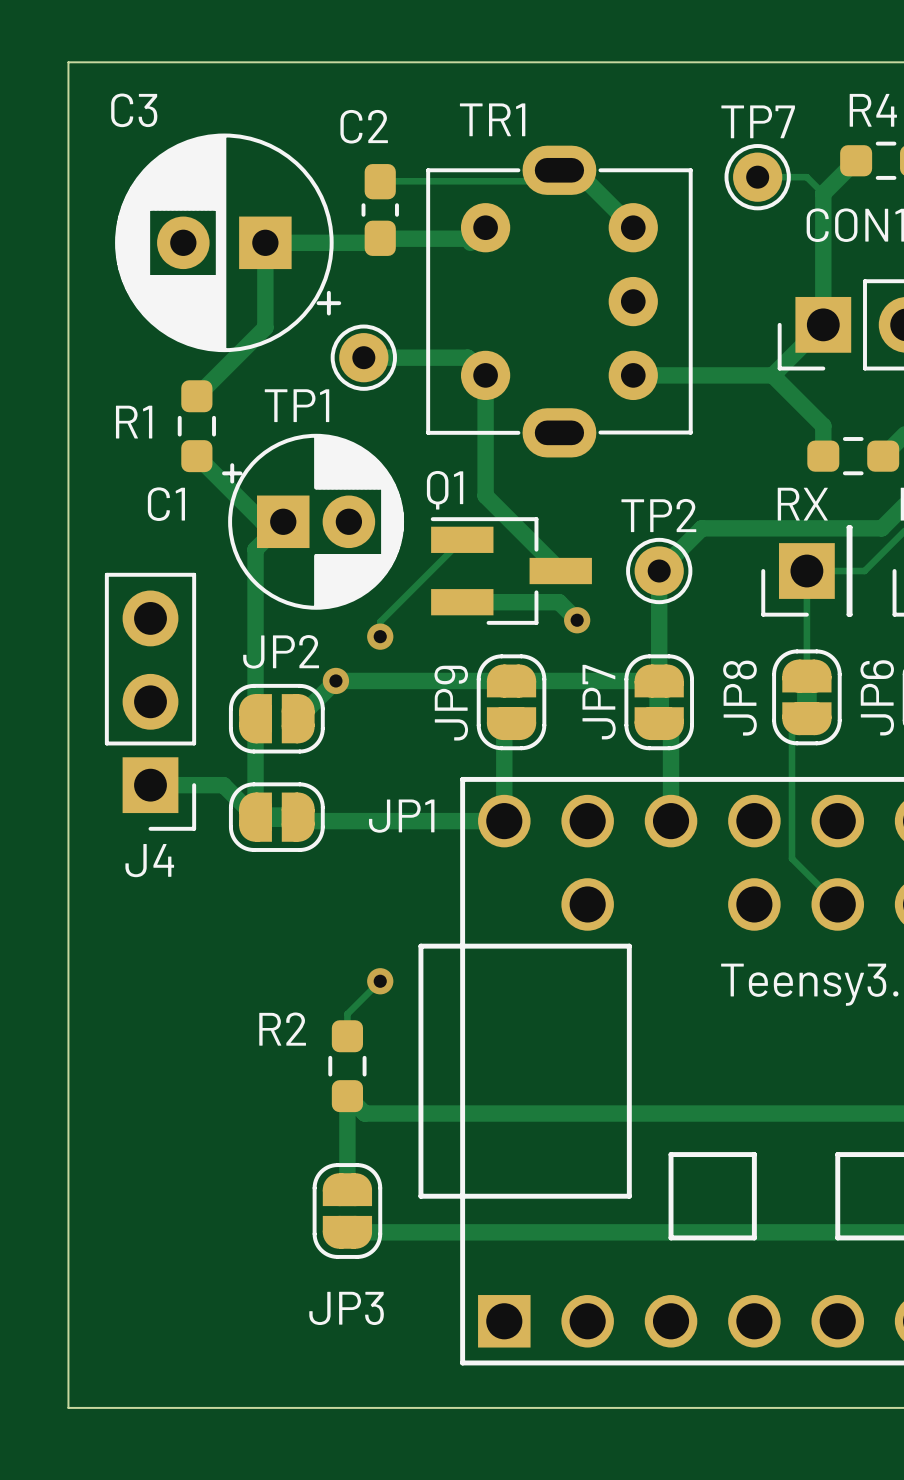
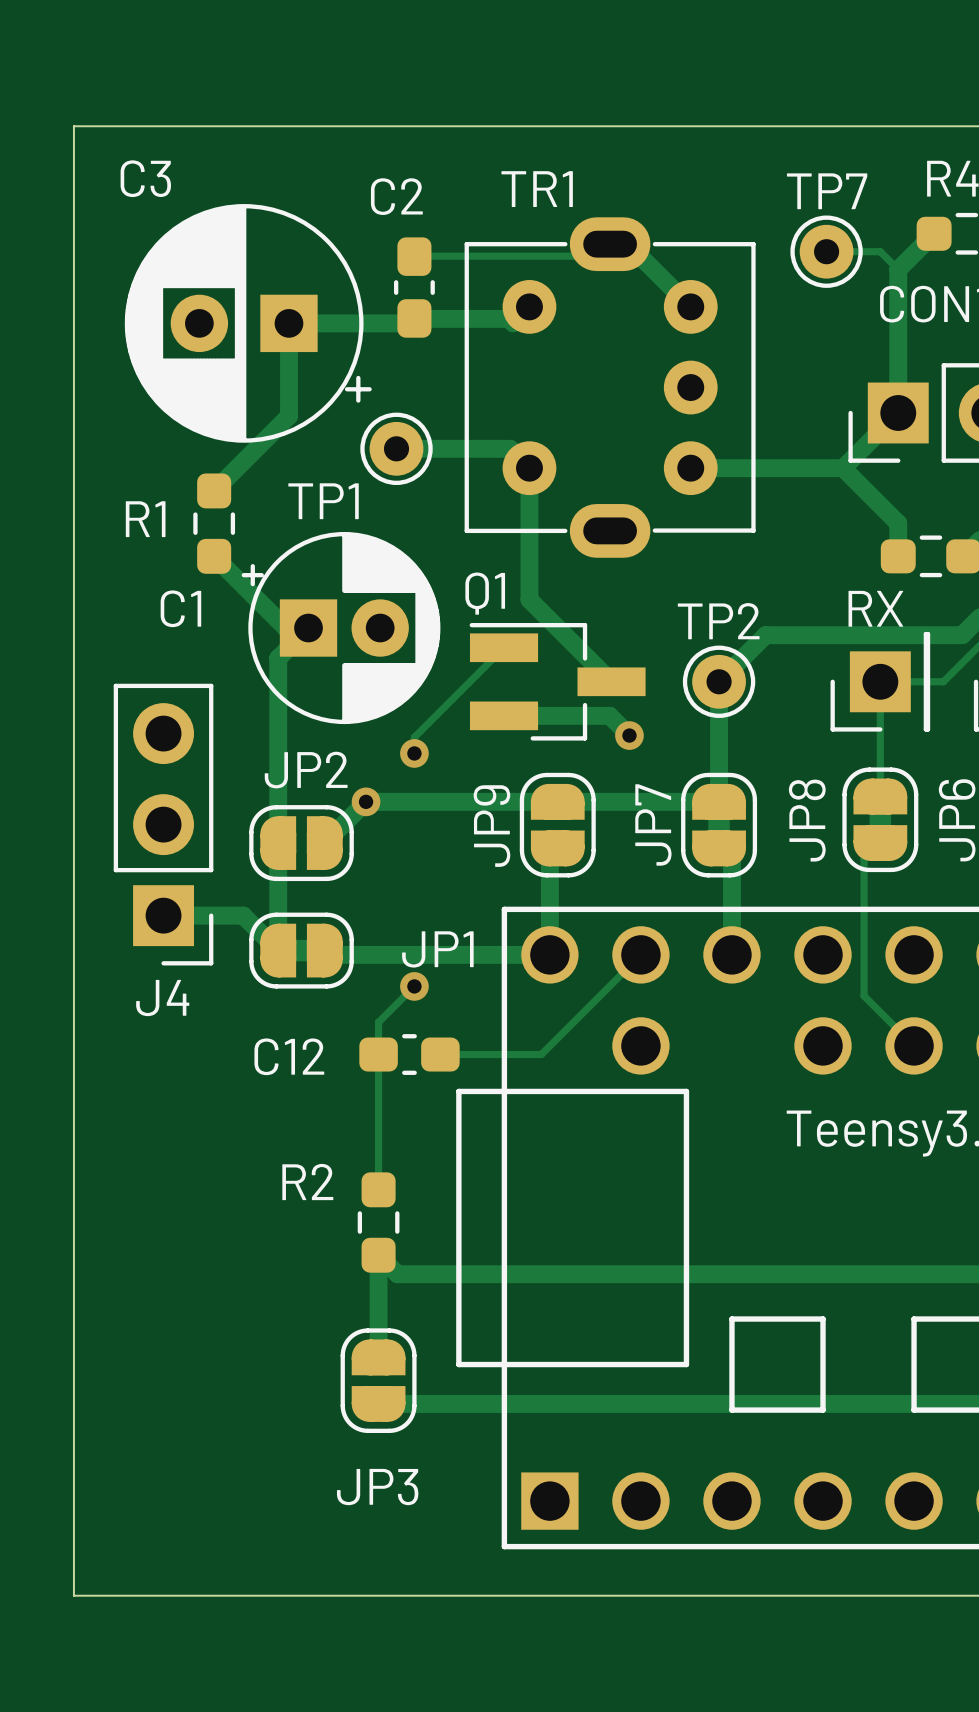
track: none -> (640, 954) (541, 1054) (440, 1054)
C12: none -> (409, 1054)
track: (380, 981) (347, 1014) -> (414, 986) (378, 1022) (378, 1165)
via position: (380, 981) -> (414, 986)

